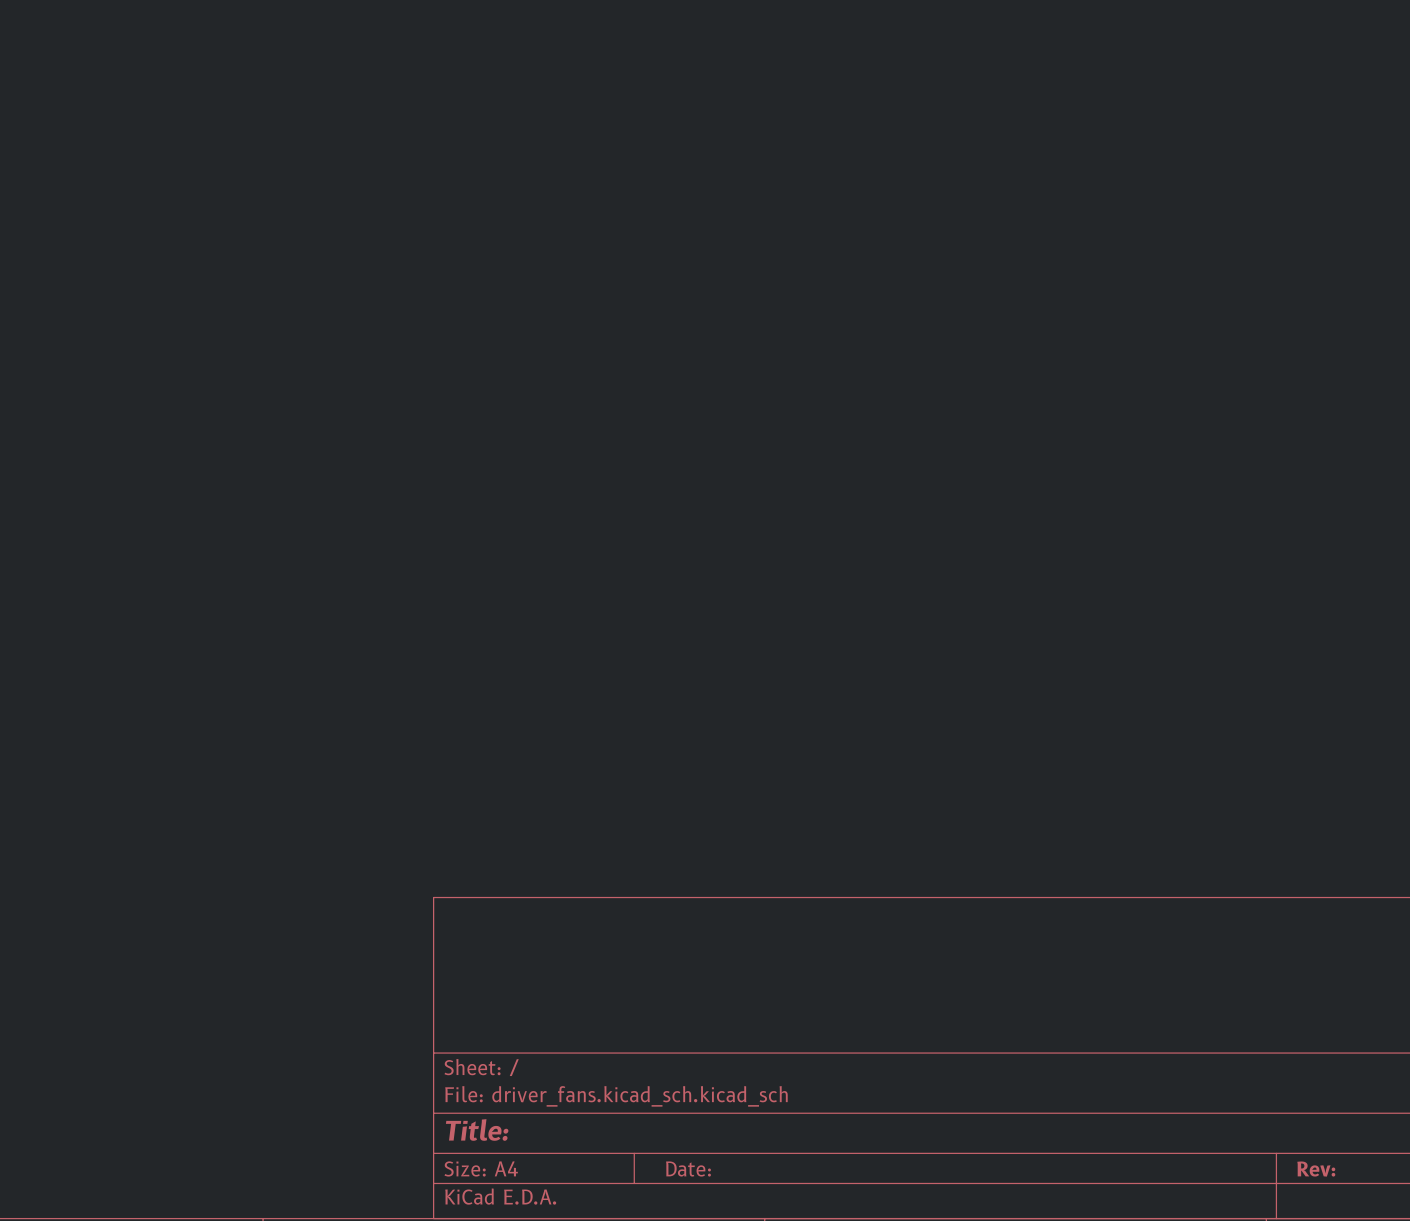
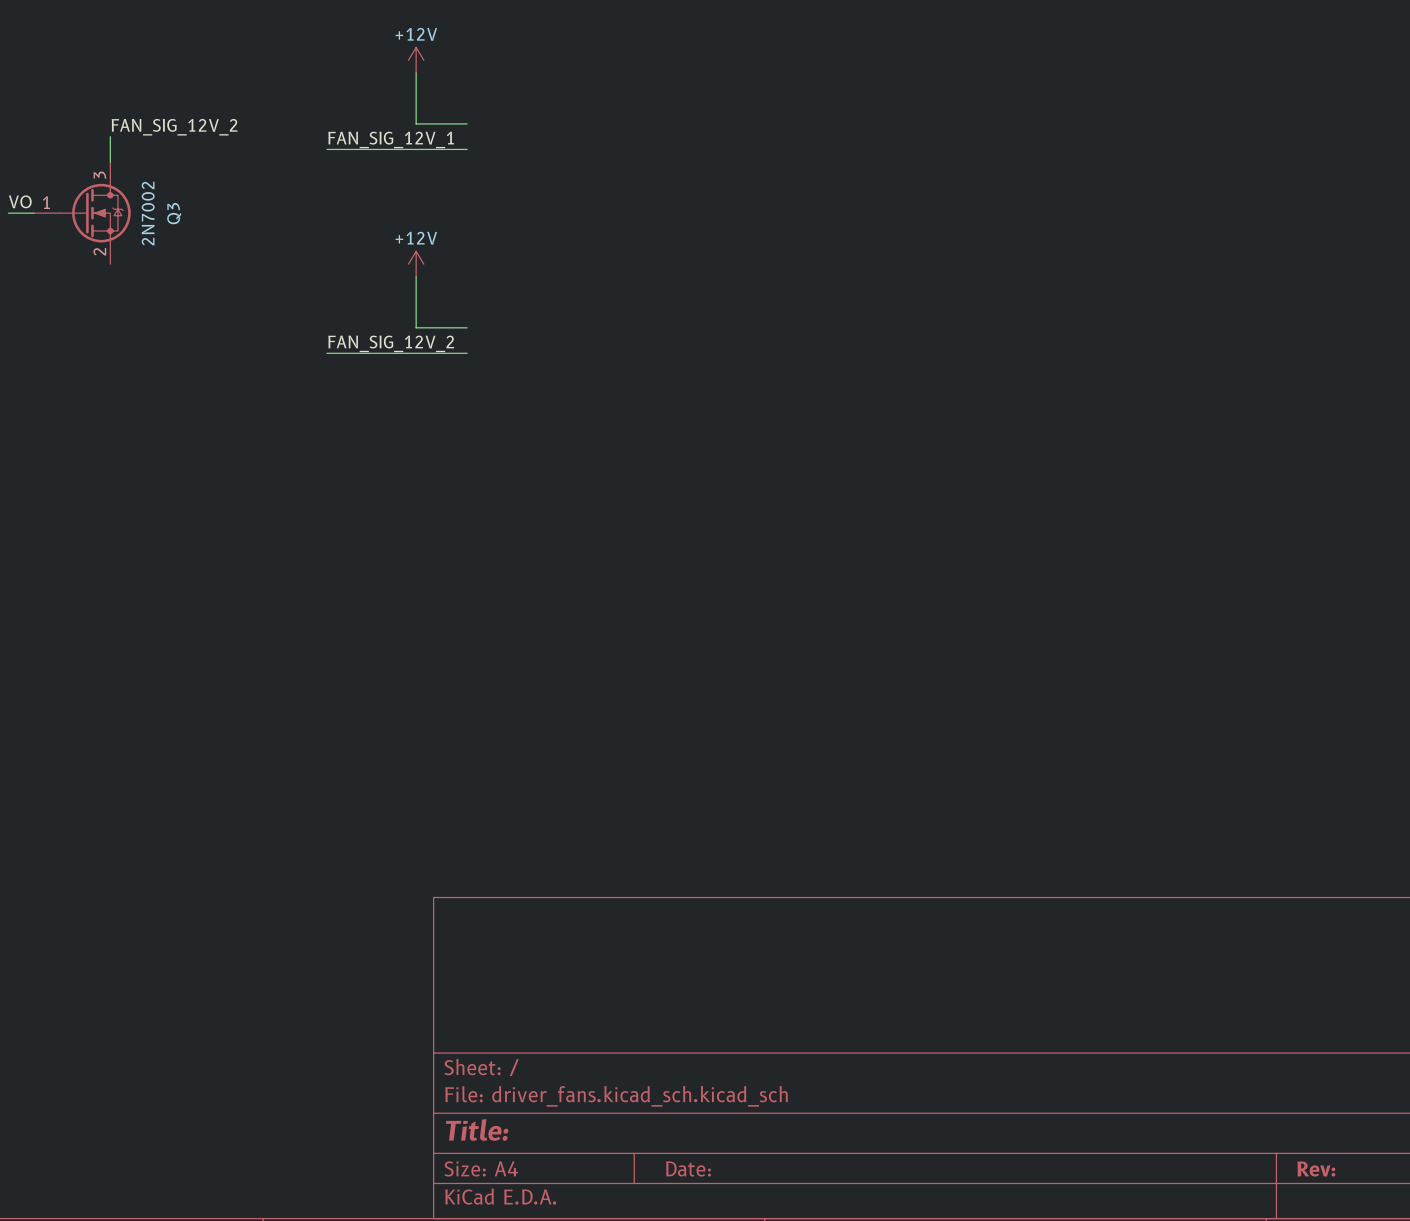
power symbol: none -> +12V (416, 60)
wire: none -> (416, 72) (416, 123) (467, 123)
label: none -> FAN_SIG_12V_2 (174, 127)
wire: none -> (110, 136) (110, 162)
label: none -> FAN_SIG_12V_1 (391, 139)
wire: none -> (326, 149) (467, 149)
label: none -> VO (20, 201)
wire: none -> (8, 213) (33, 213)
Q3: none -> 2N7002 (82, 213)
power symbol: none -> +12V (416, 264)
wire: none -> (416, 276) (416, 327) (467, 327)
label: none -> FAN_SIG_12V_2 (391, 343)
wire: none -> (326, 353) (467, 353)

